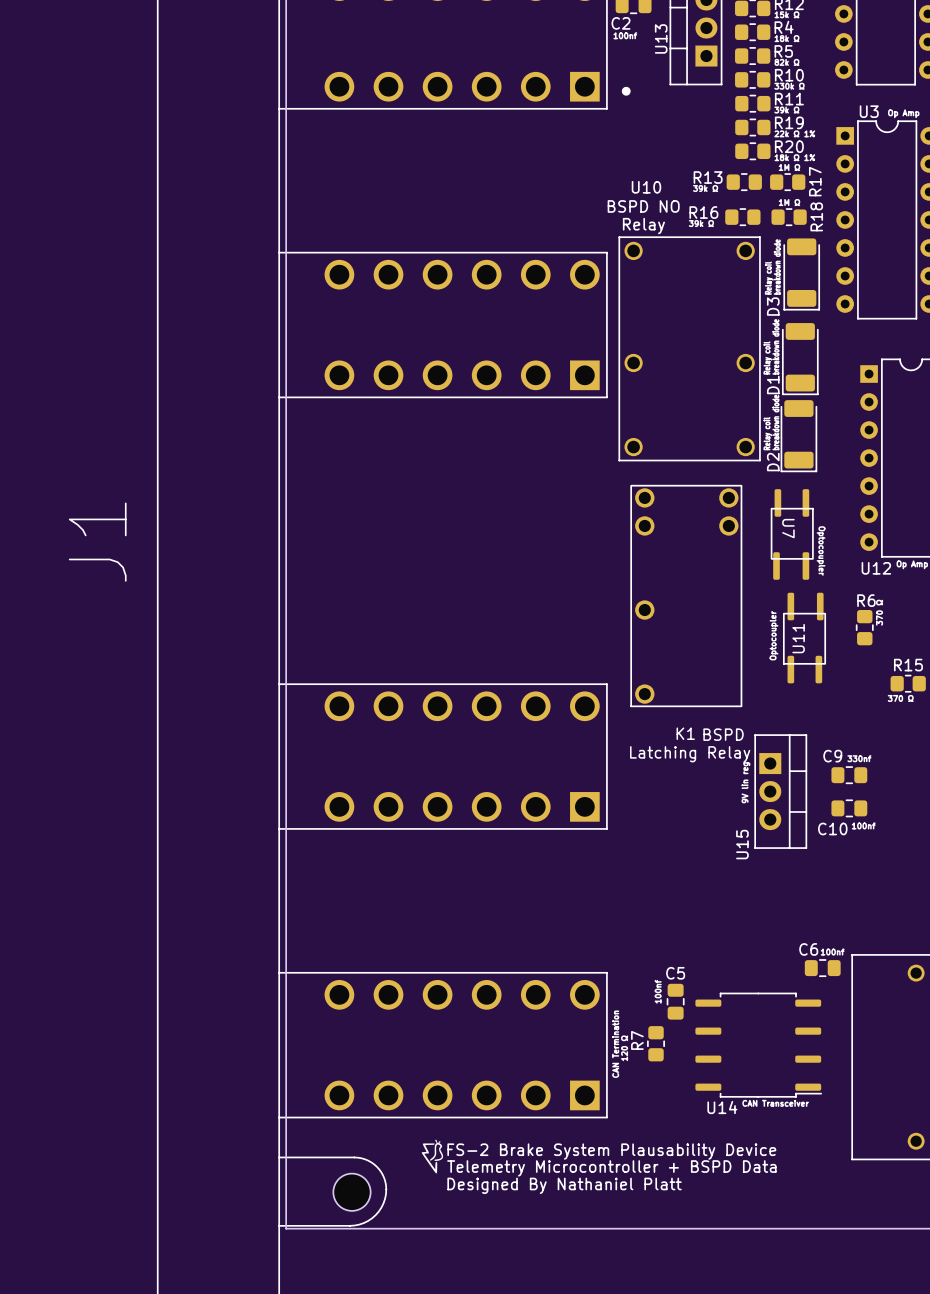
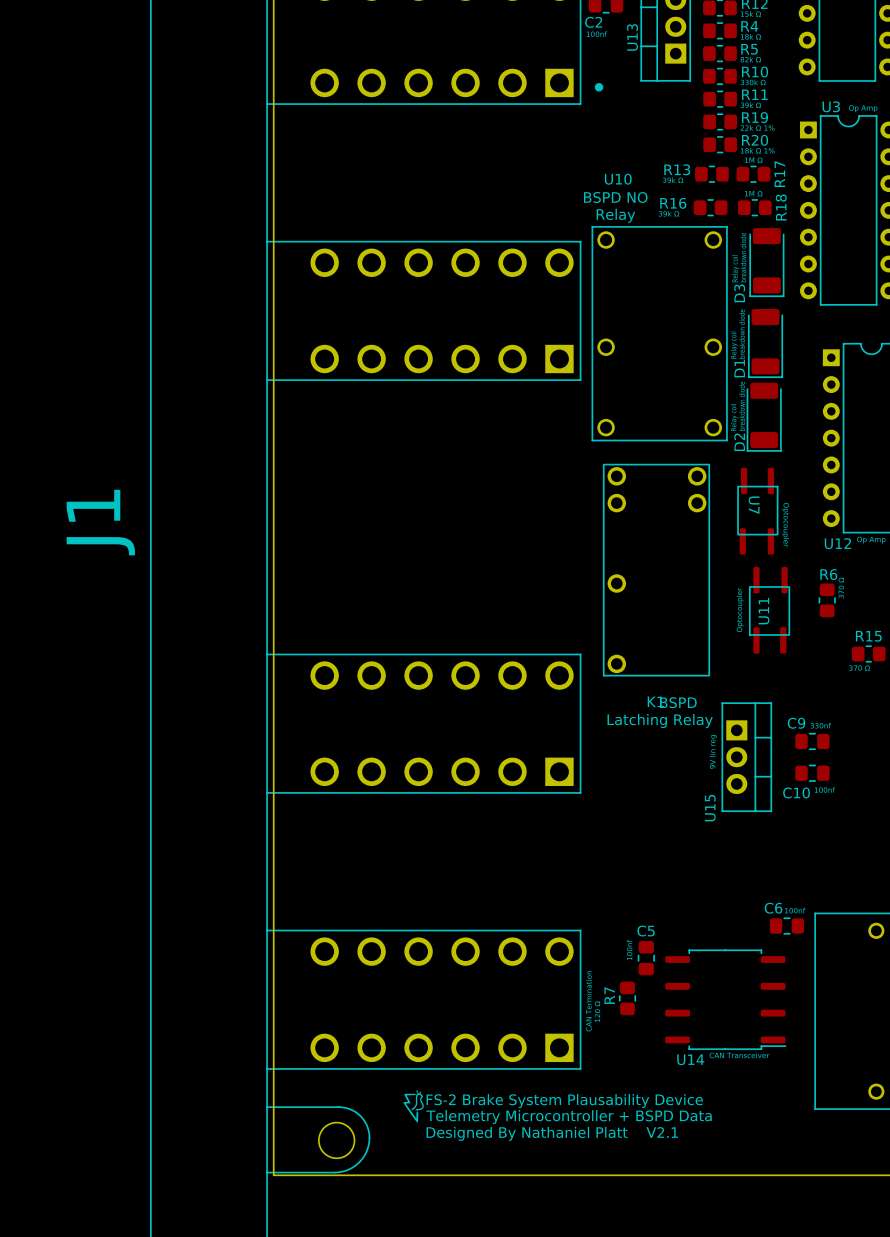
text: Designed By Nathaniel Platt (564, 1185) -> Designed By Nathaniel Platt V2.1 (552, 1133)

